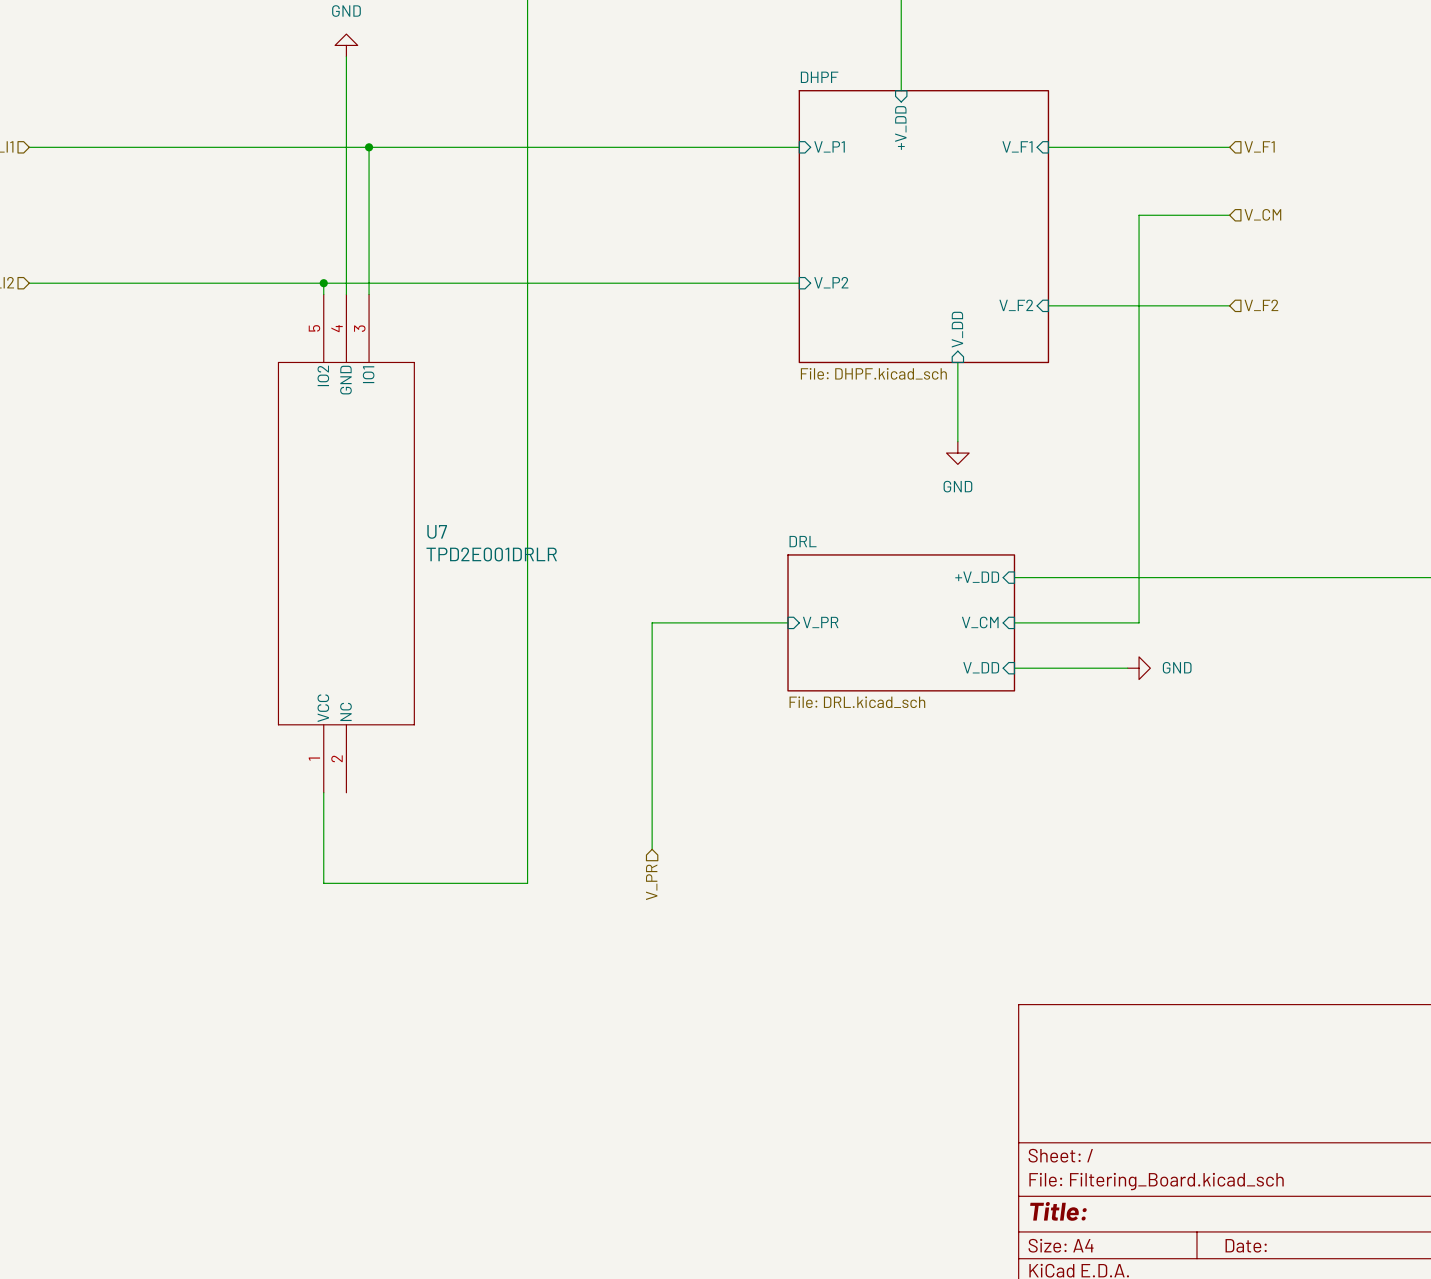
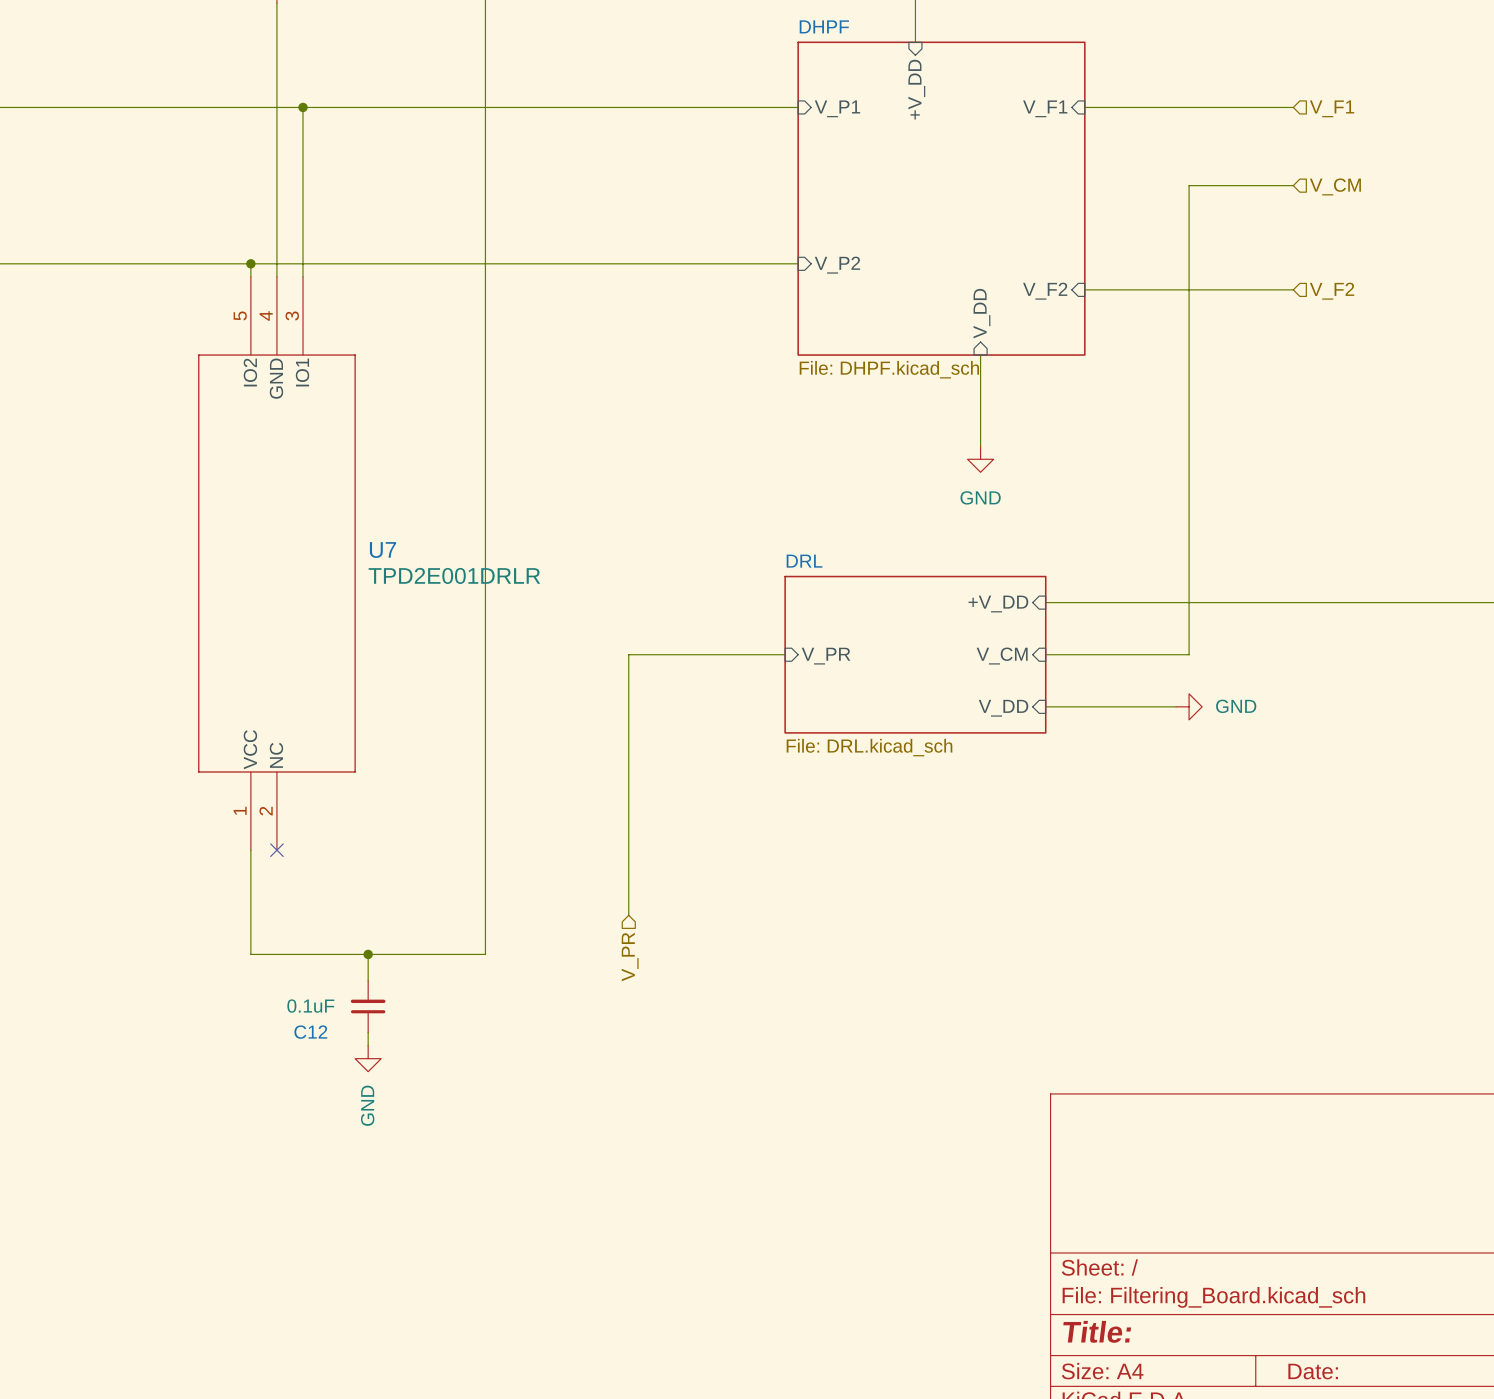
no-connect mark: none -> (276, 850)
wire: none -> (368, 954) (368, 980)
junction: none -> (368, 954)
C12: none -> 0.1uF (368, 1006)
wire: none -> (368, 1032) (368, 1045)
power symbol: none -> GND (368, 1058)

